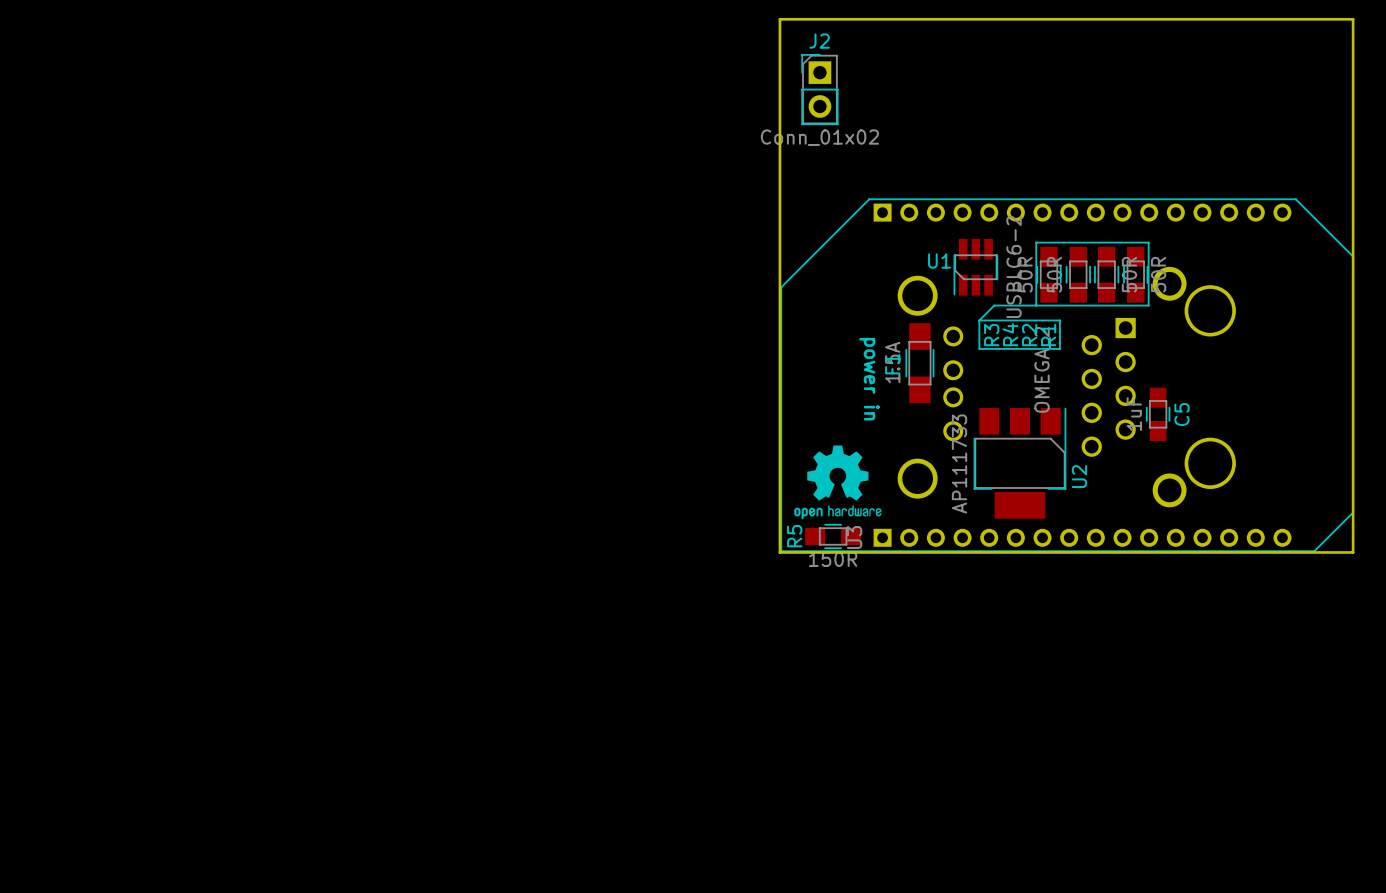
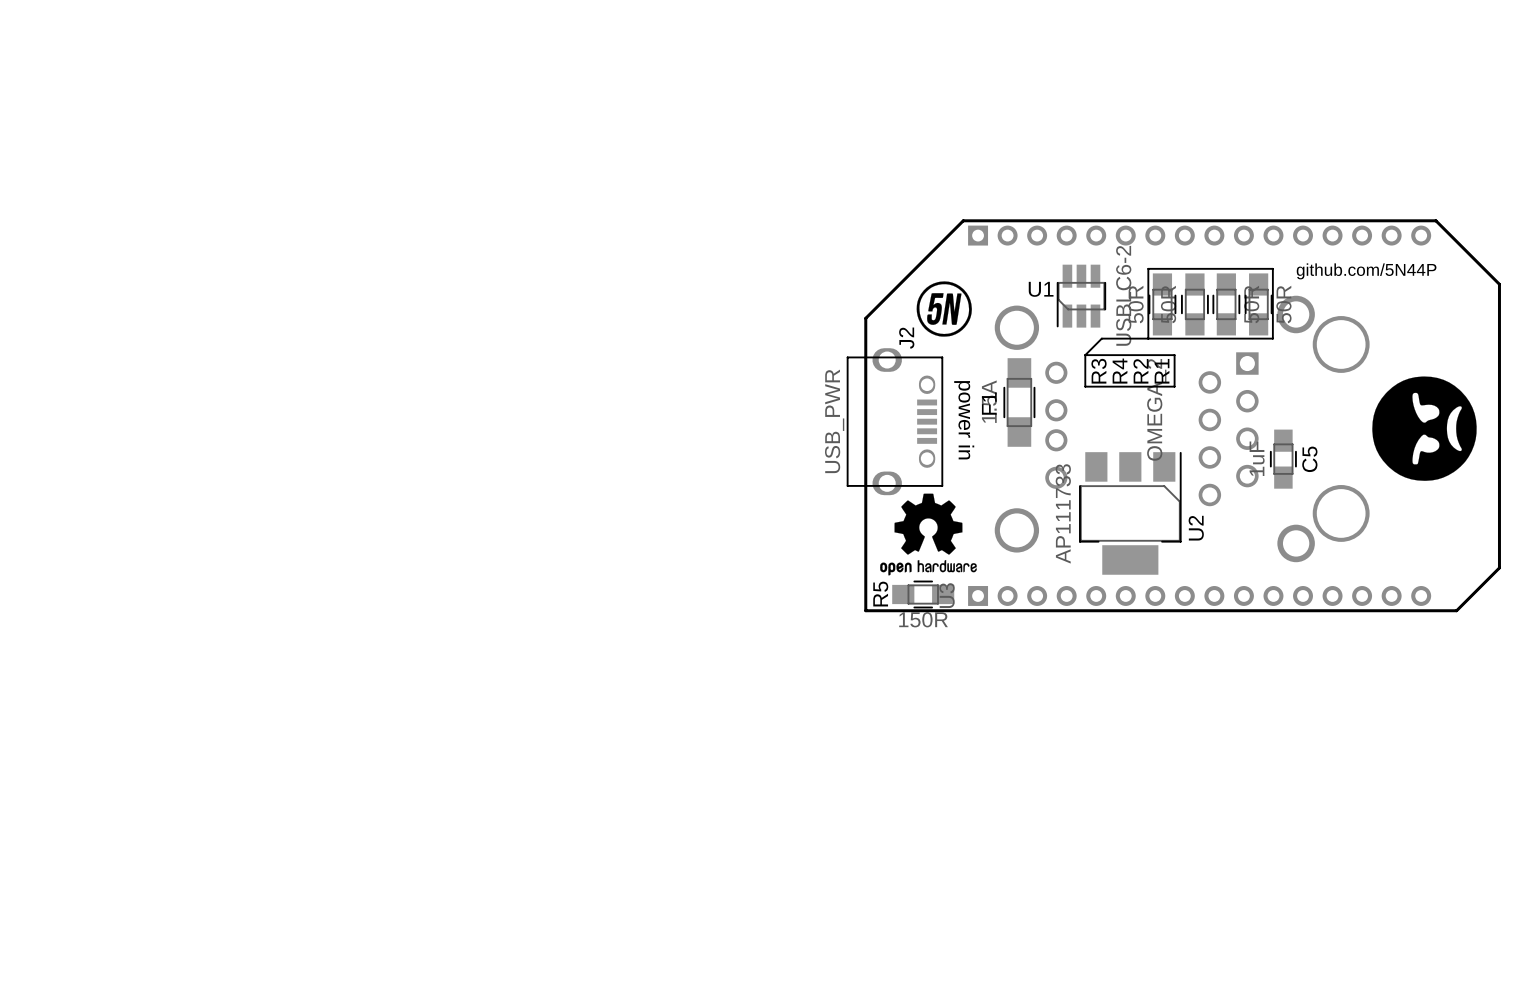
J2 name position: J2 (819, 41) -> J2 (906, 338)
J2 footprint: [801, 54, 839, 126] -> [846, 348, 944, 496]
J2 value: Conn_01x02 (819, 137) -> USB_PWR (834, 421)
text: none -> github.com/5N44P (1366, 271)
drawing: none -> [916, 281, 972, 337]
board edge: (1353, 256) (1353, 19) (779, 19) (779, 552) (1353, 552) (1353, 512) -> (1499, 284) (1435, 220) (963, 220) (865, 318) (865, 610) (1456, 610) (1499, 567)
drawing: none -> [1372, 376, 1477, 481]

